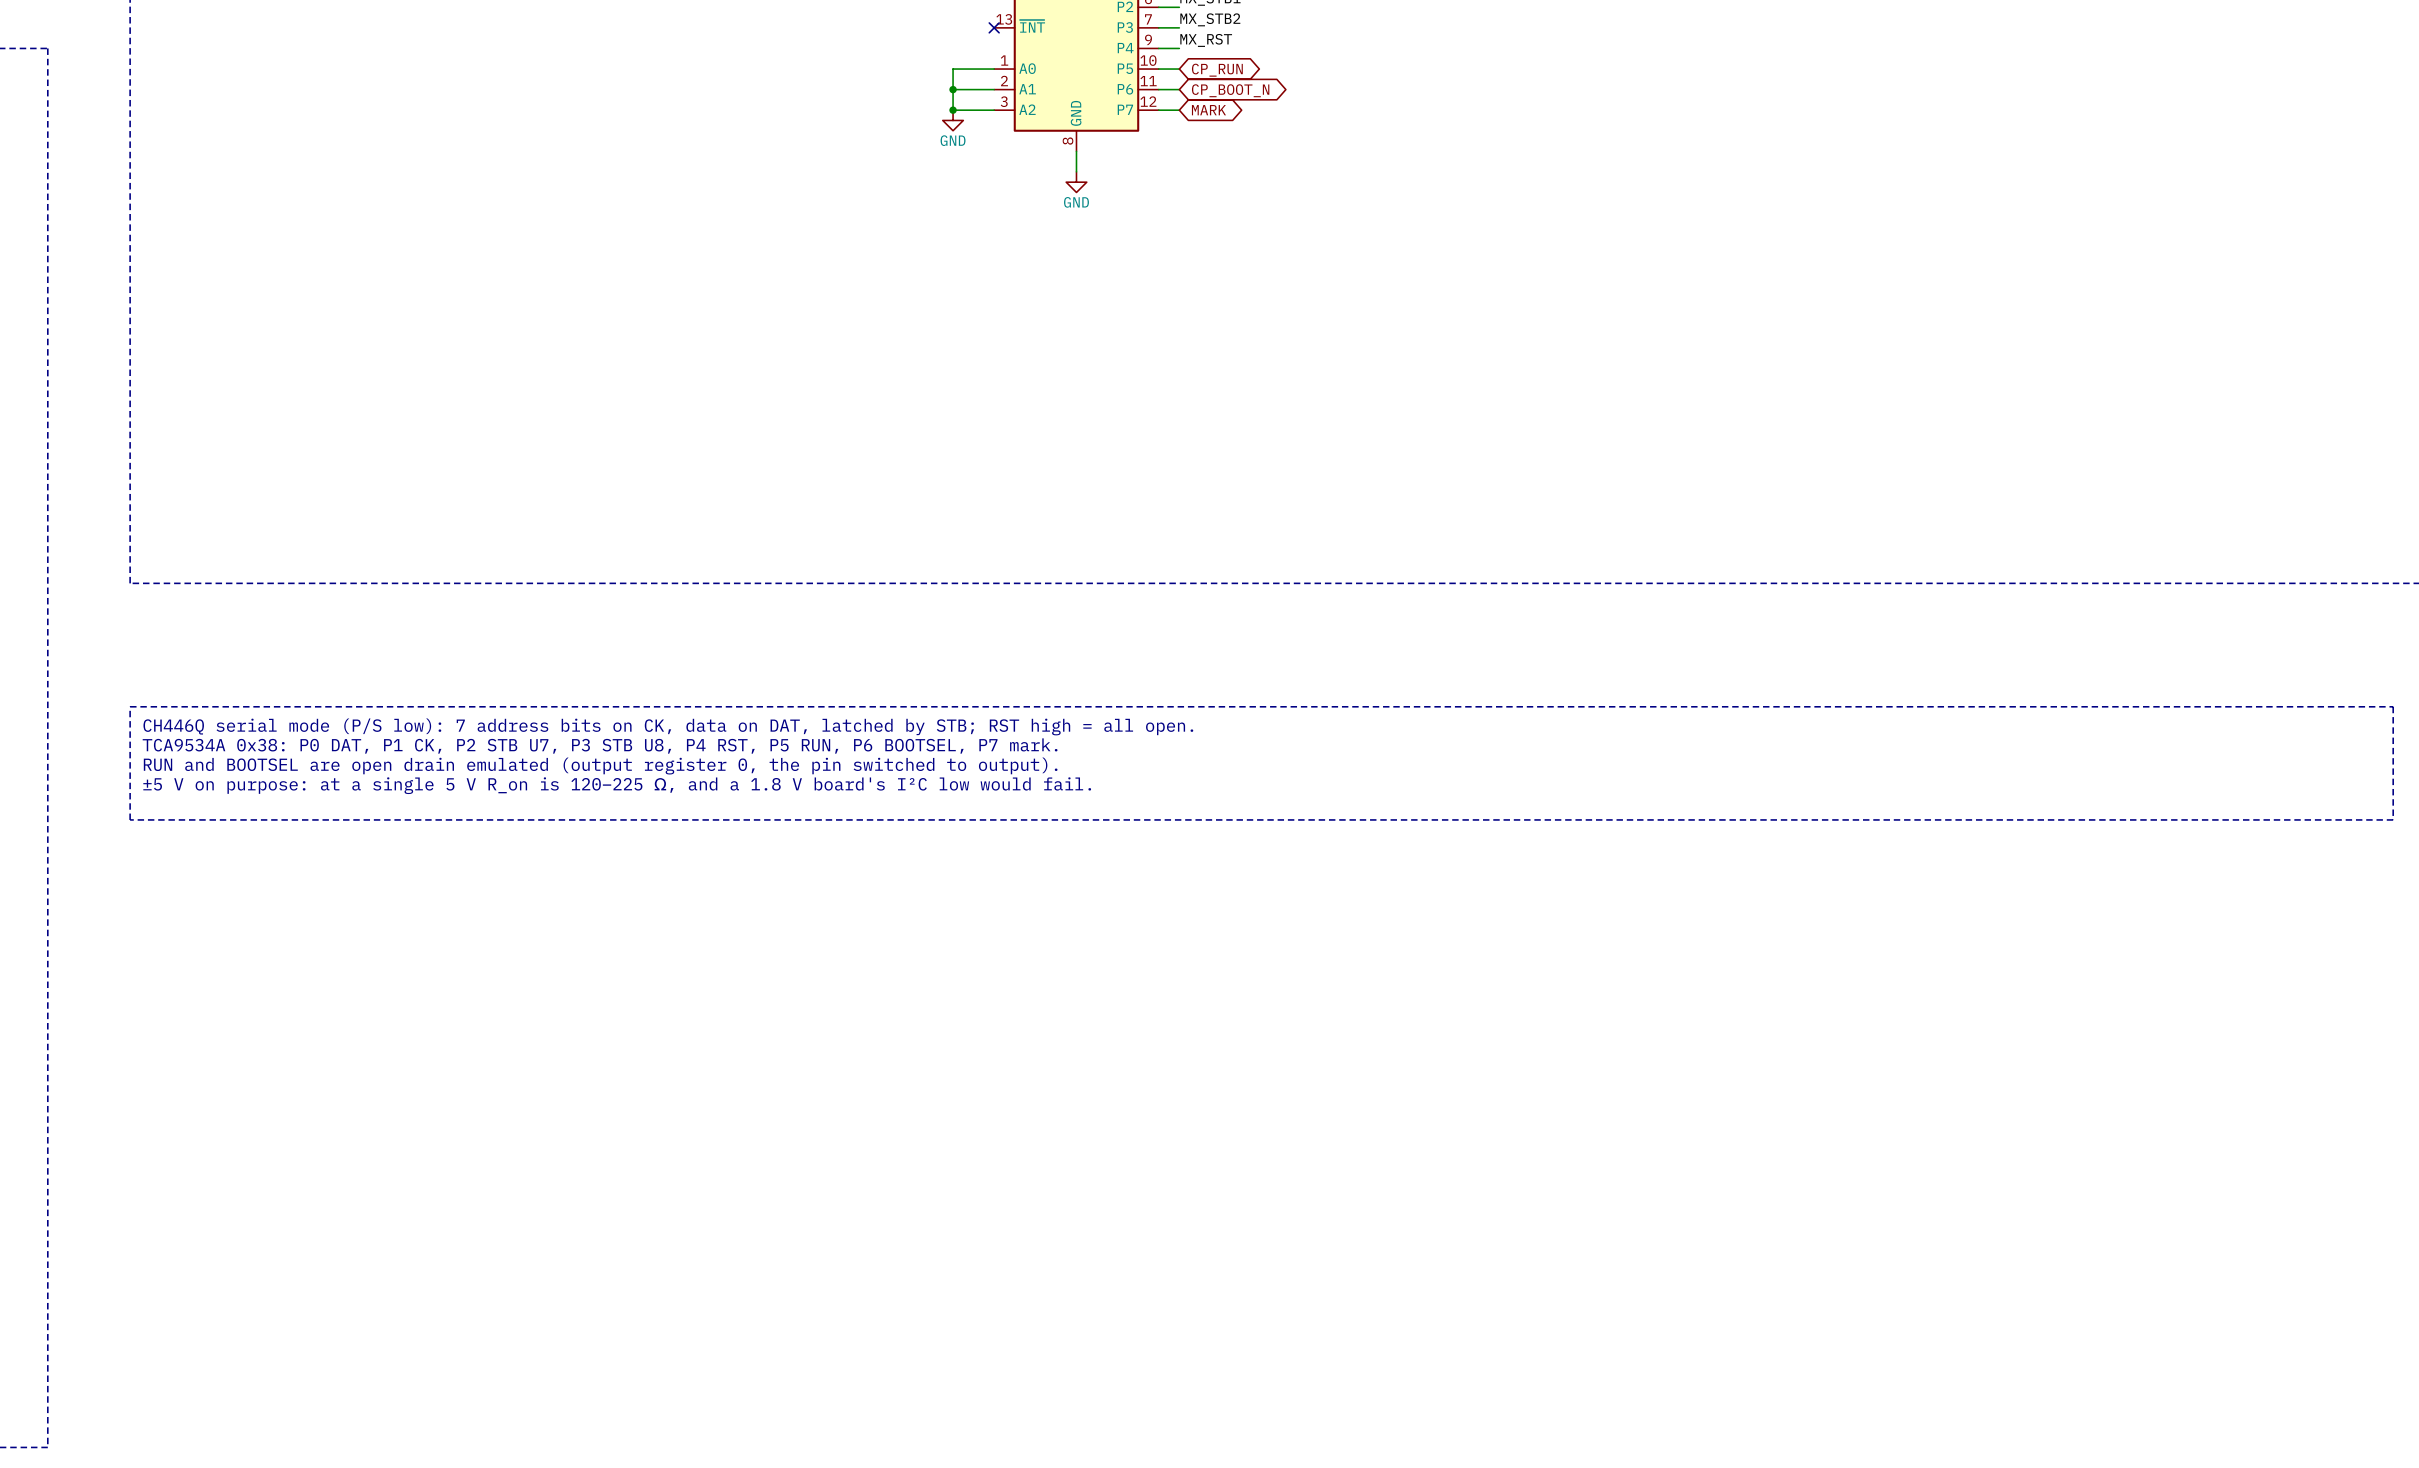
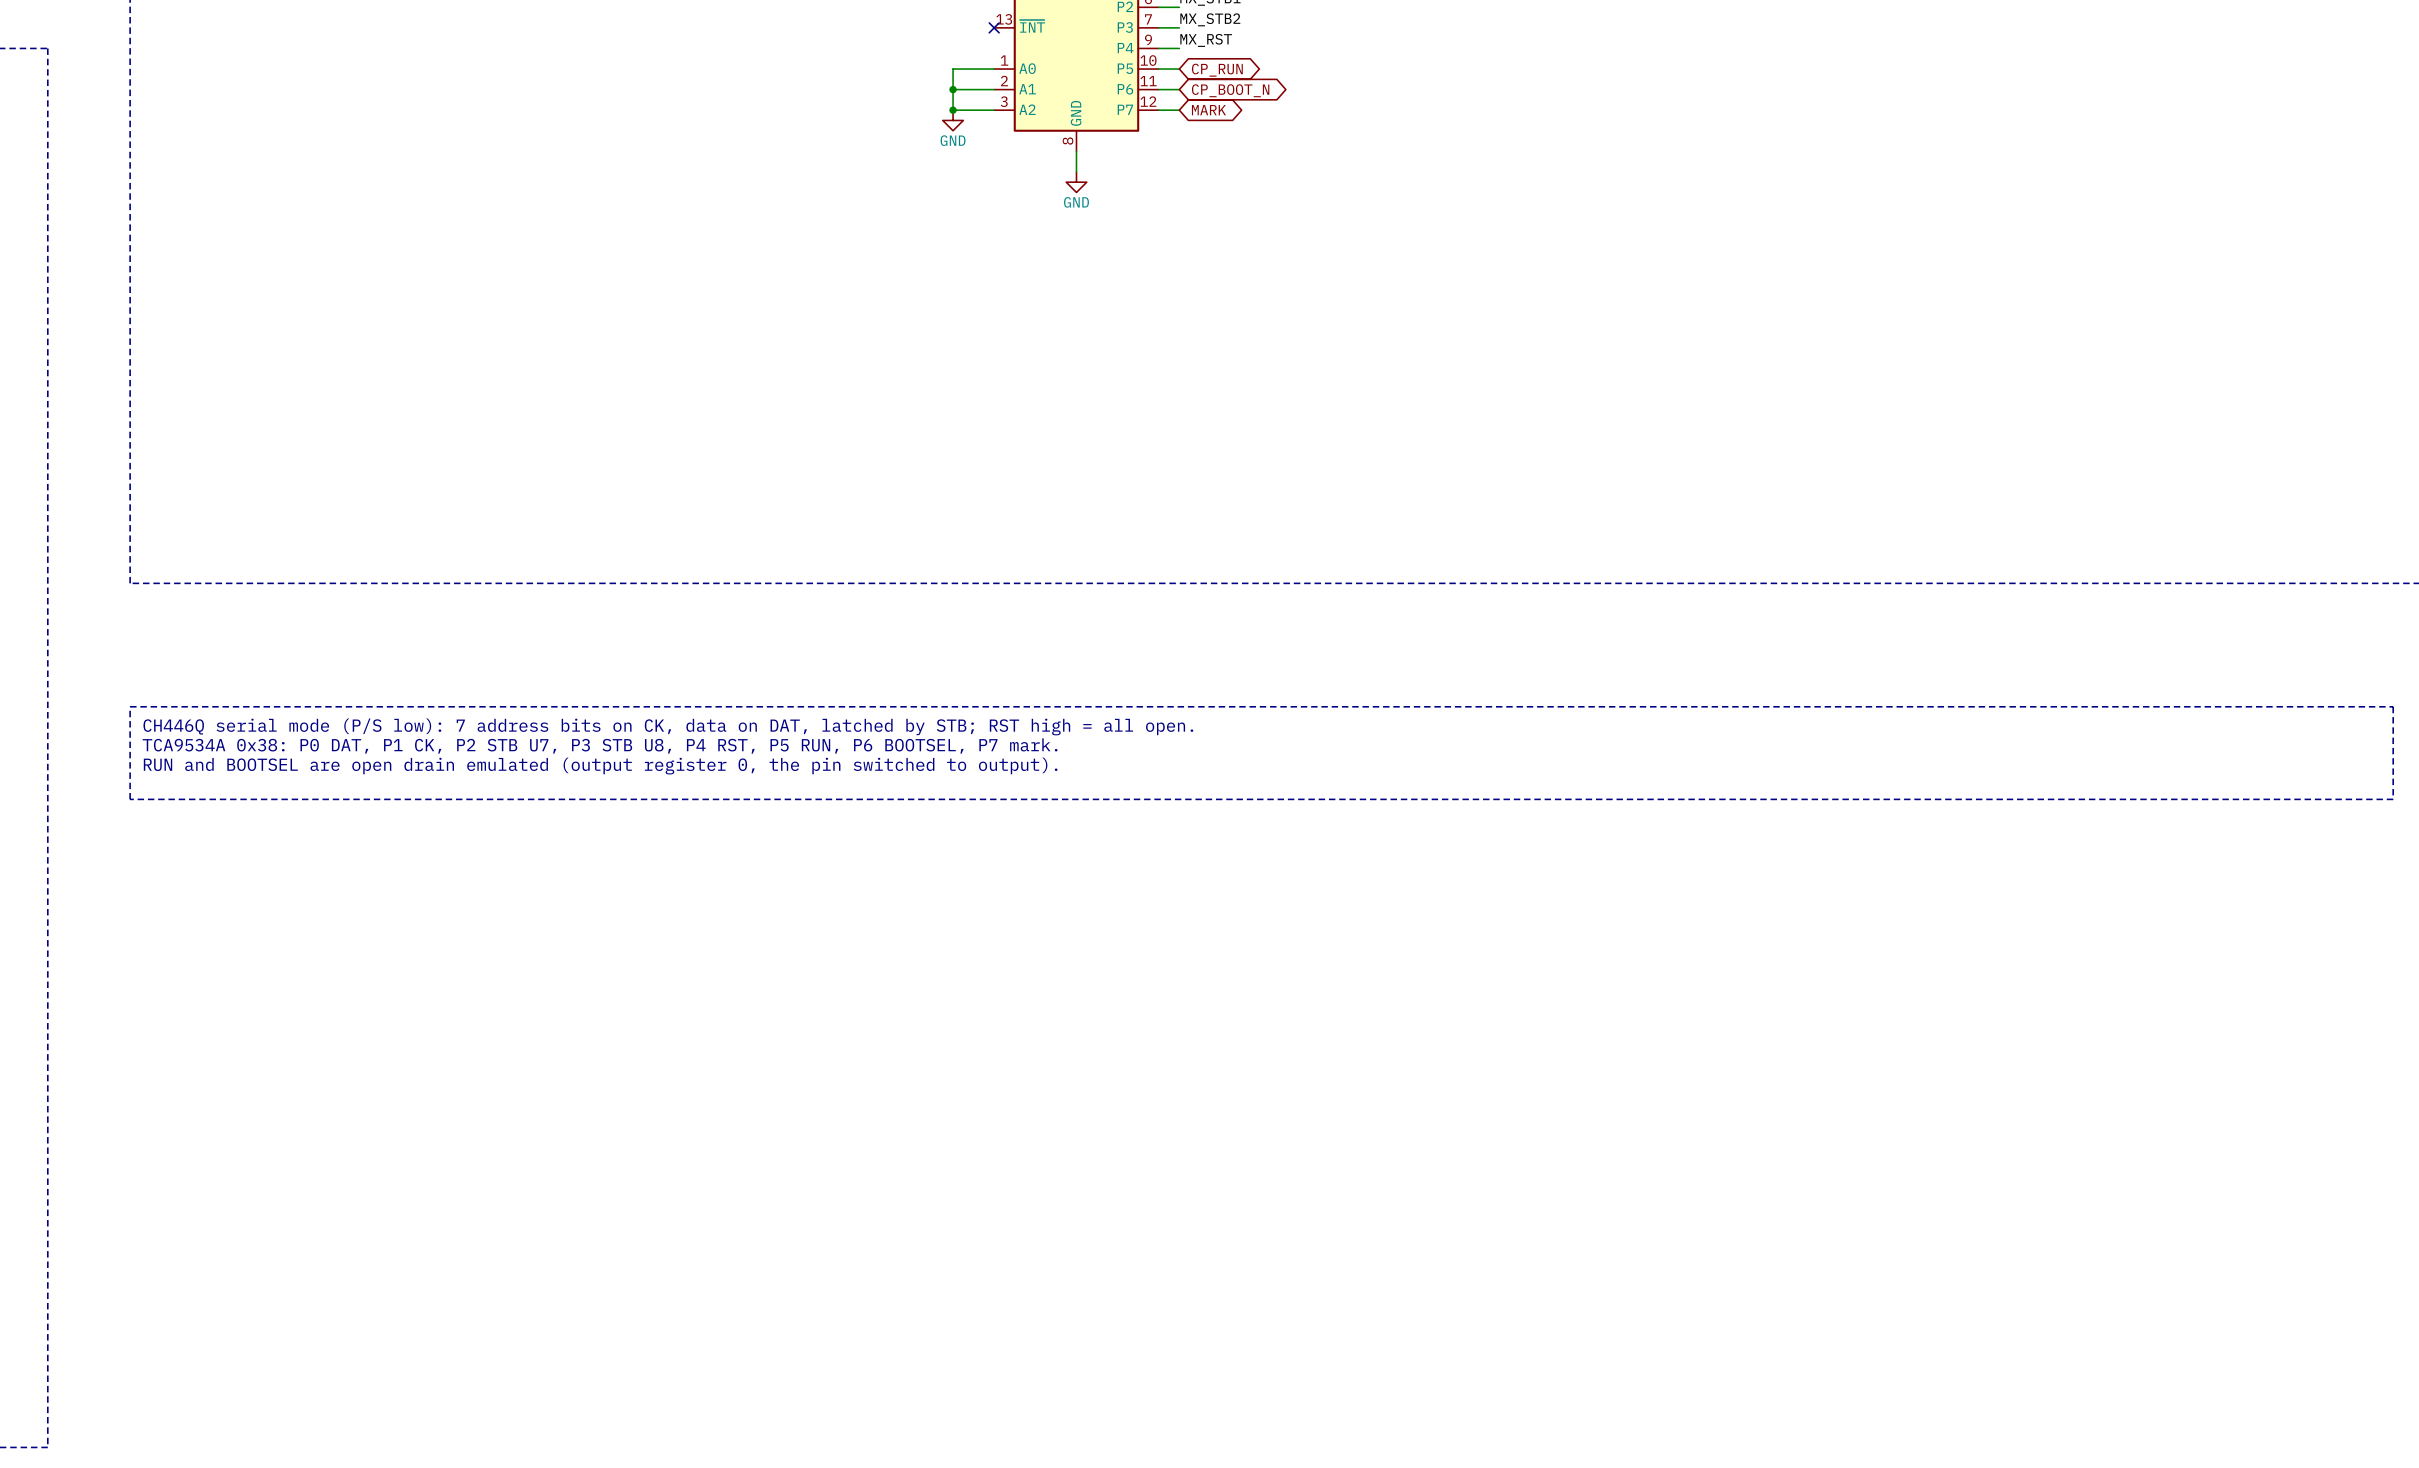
text: ±5 V on purpose: at a single 5 V R_on is 120–225 Ω, and a 1.8 V board's I²C low would fail. (617, 785) -> none
line: (130, 799) (130, 819) (2393, 819) (2393, 799) -> (130, 799) (2393, 799)

